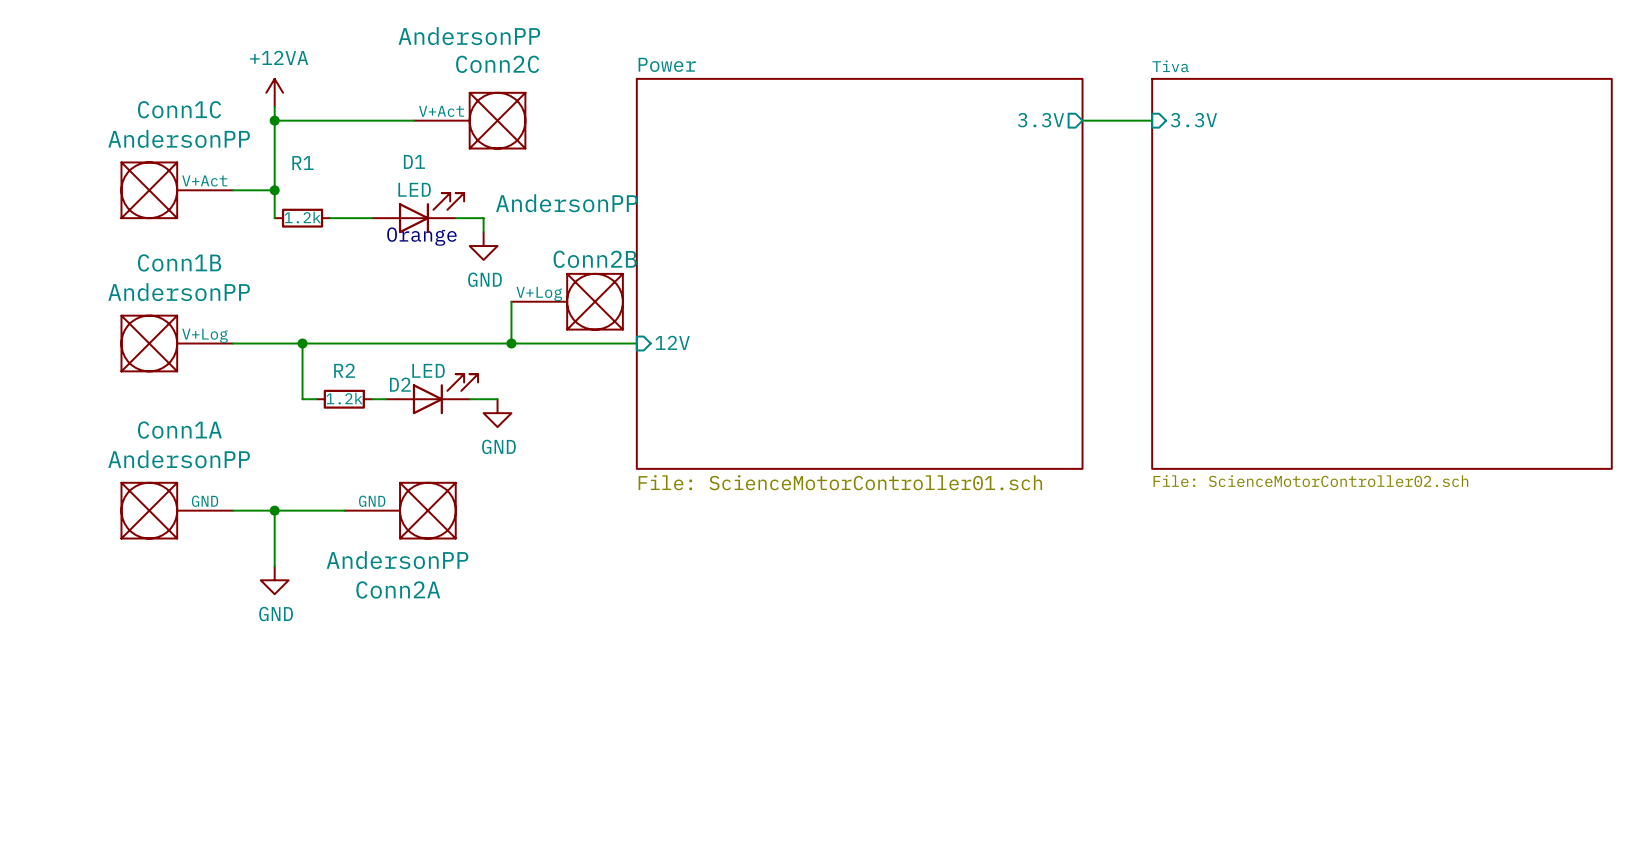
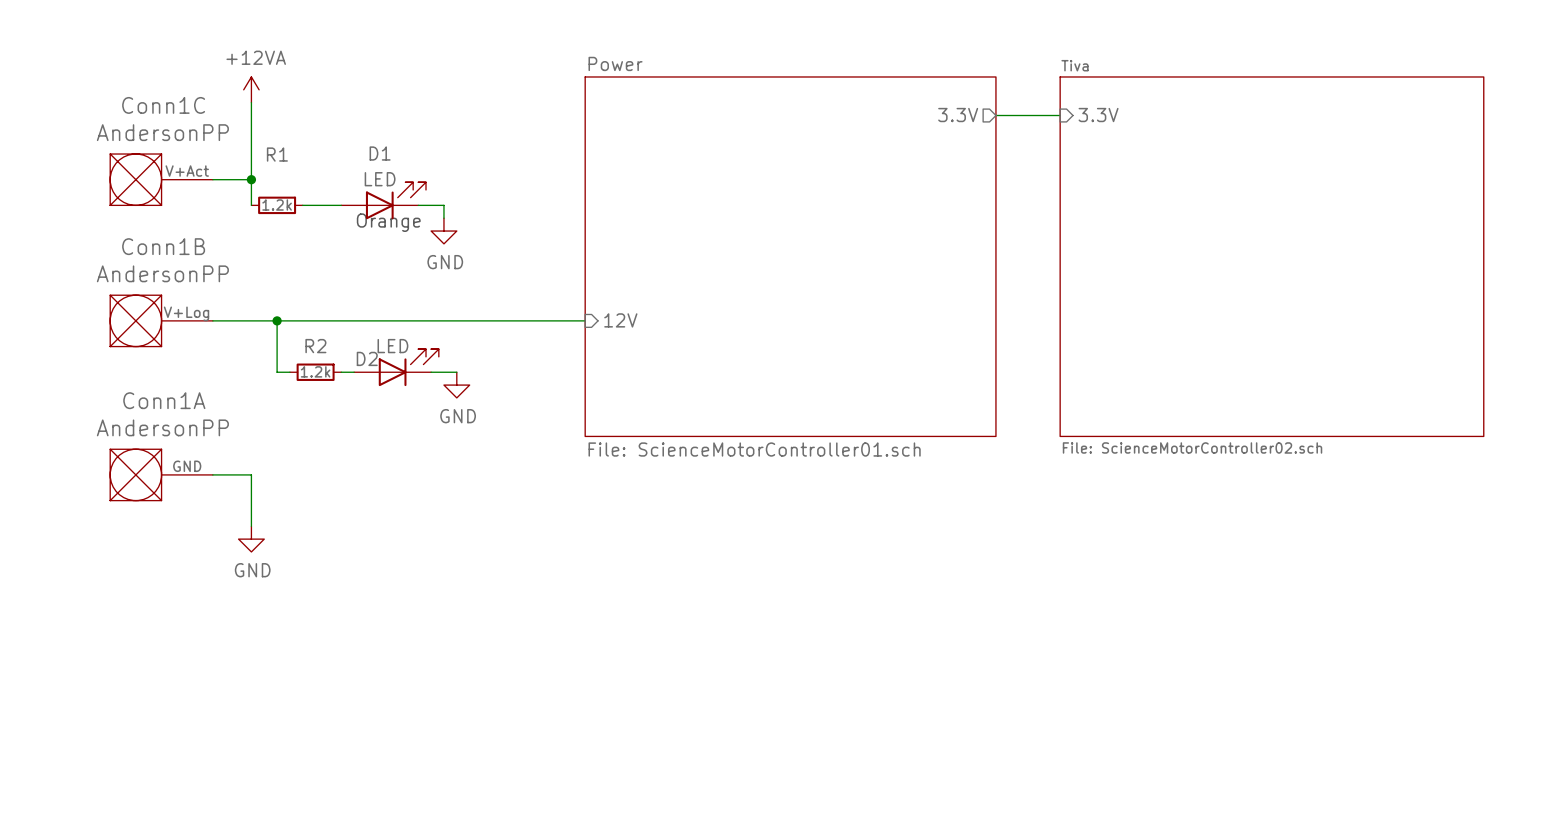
wire: (274, 120) (413, 120) -> none
junction: (274, 120) -> none
Conn2C: AndersonPP (469, 120) -> none
wire: (511, 301) (511, 343) -> none
Conn2B: AndersonPP (567, 301) -> none
junction: (511, 343) -> none
wire: (274, 510) (344, 510) -> none
junction: (274, 510) -> none
Conn2A: AndersonPP (400, 510) -> none

